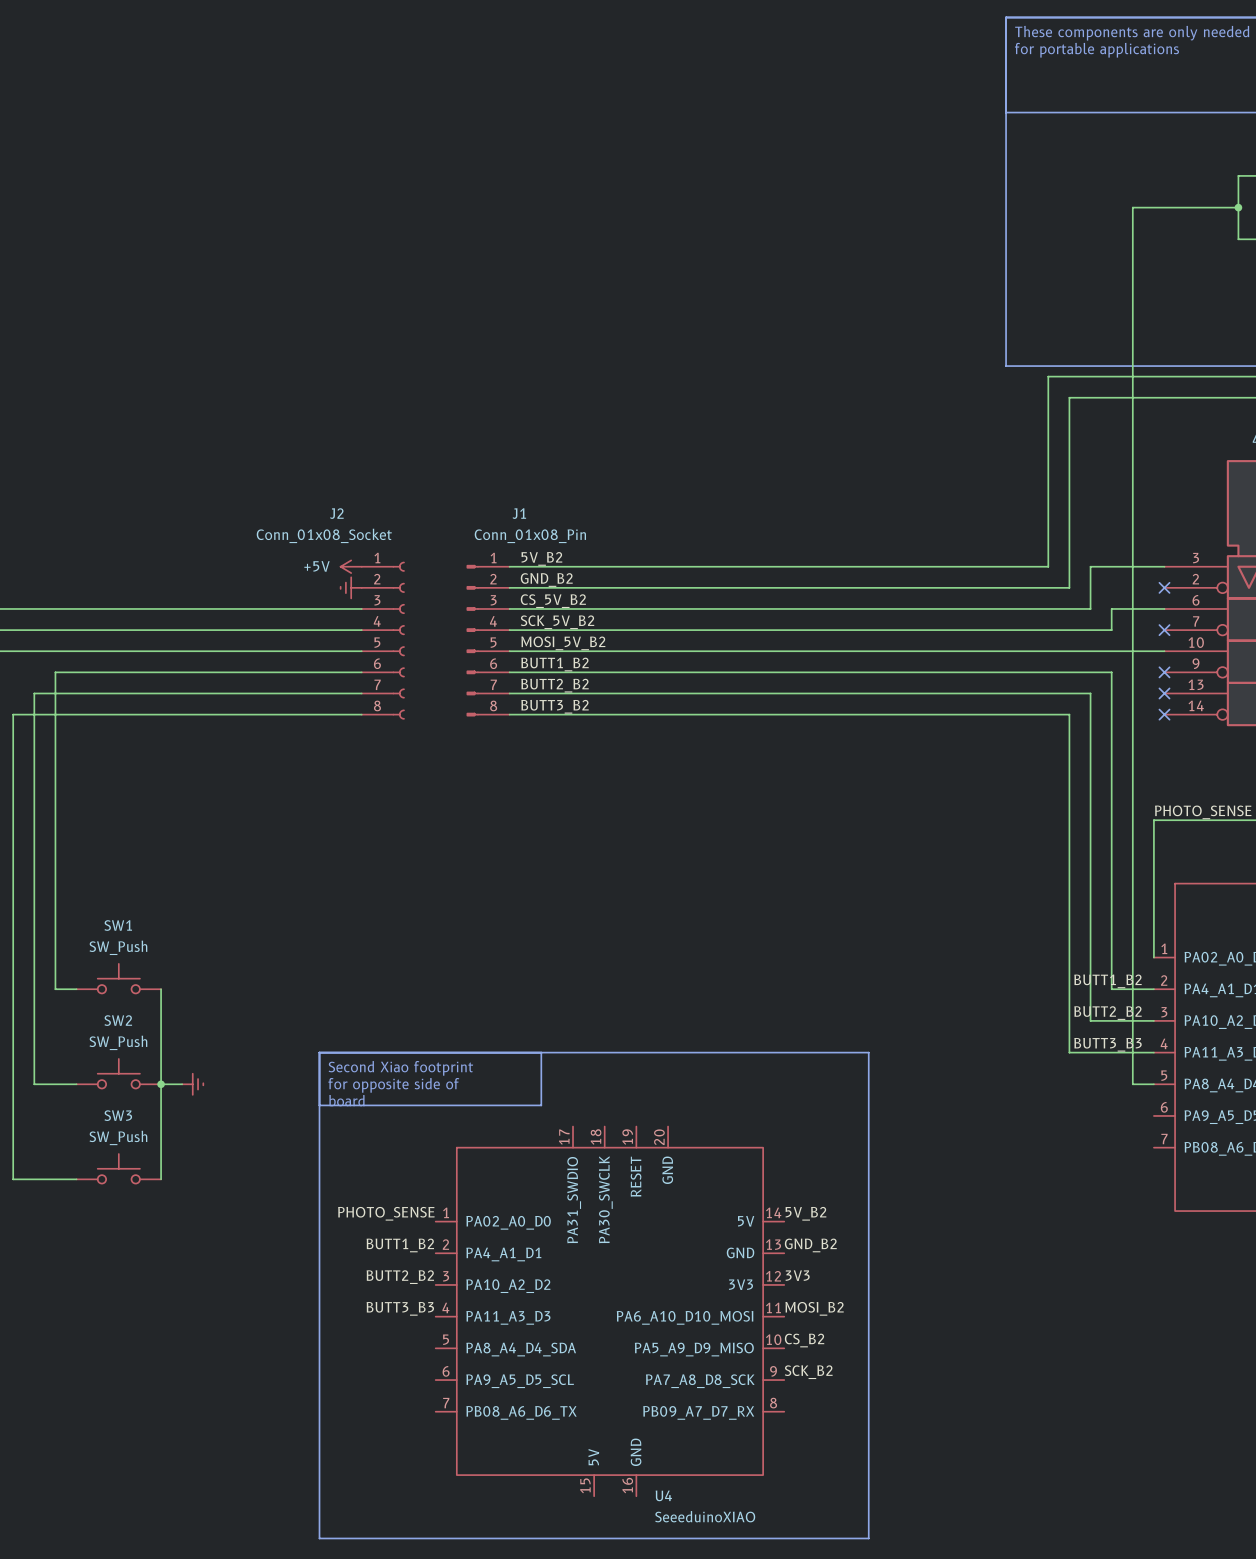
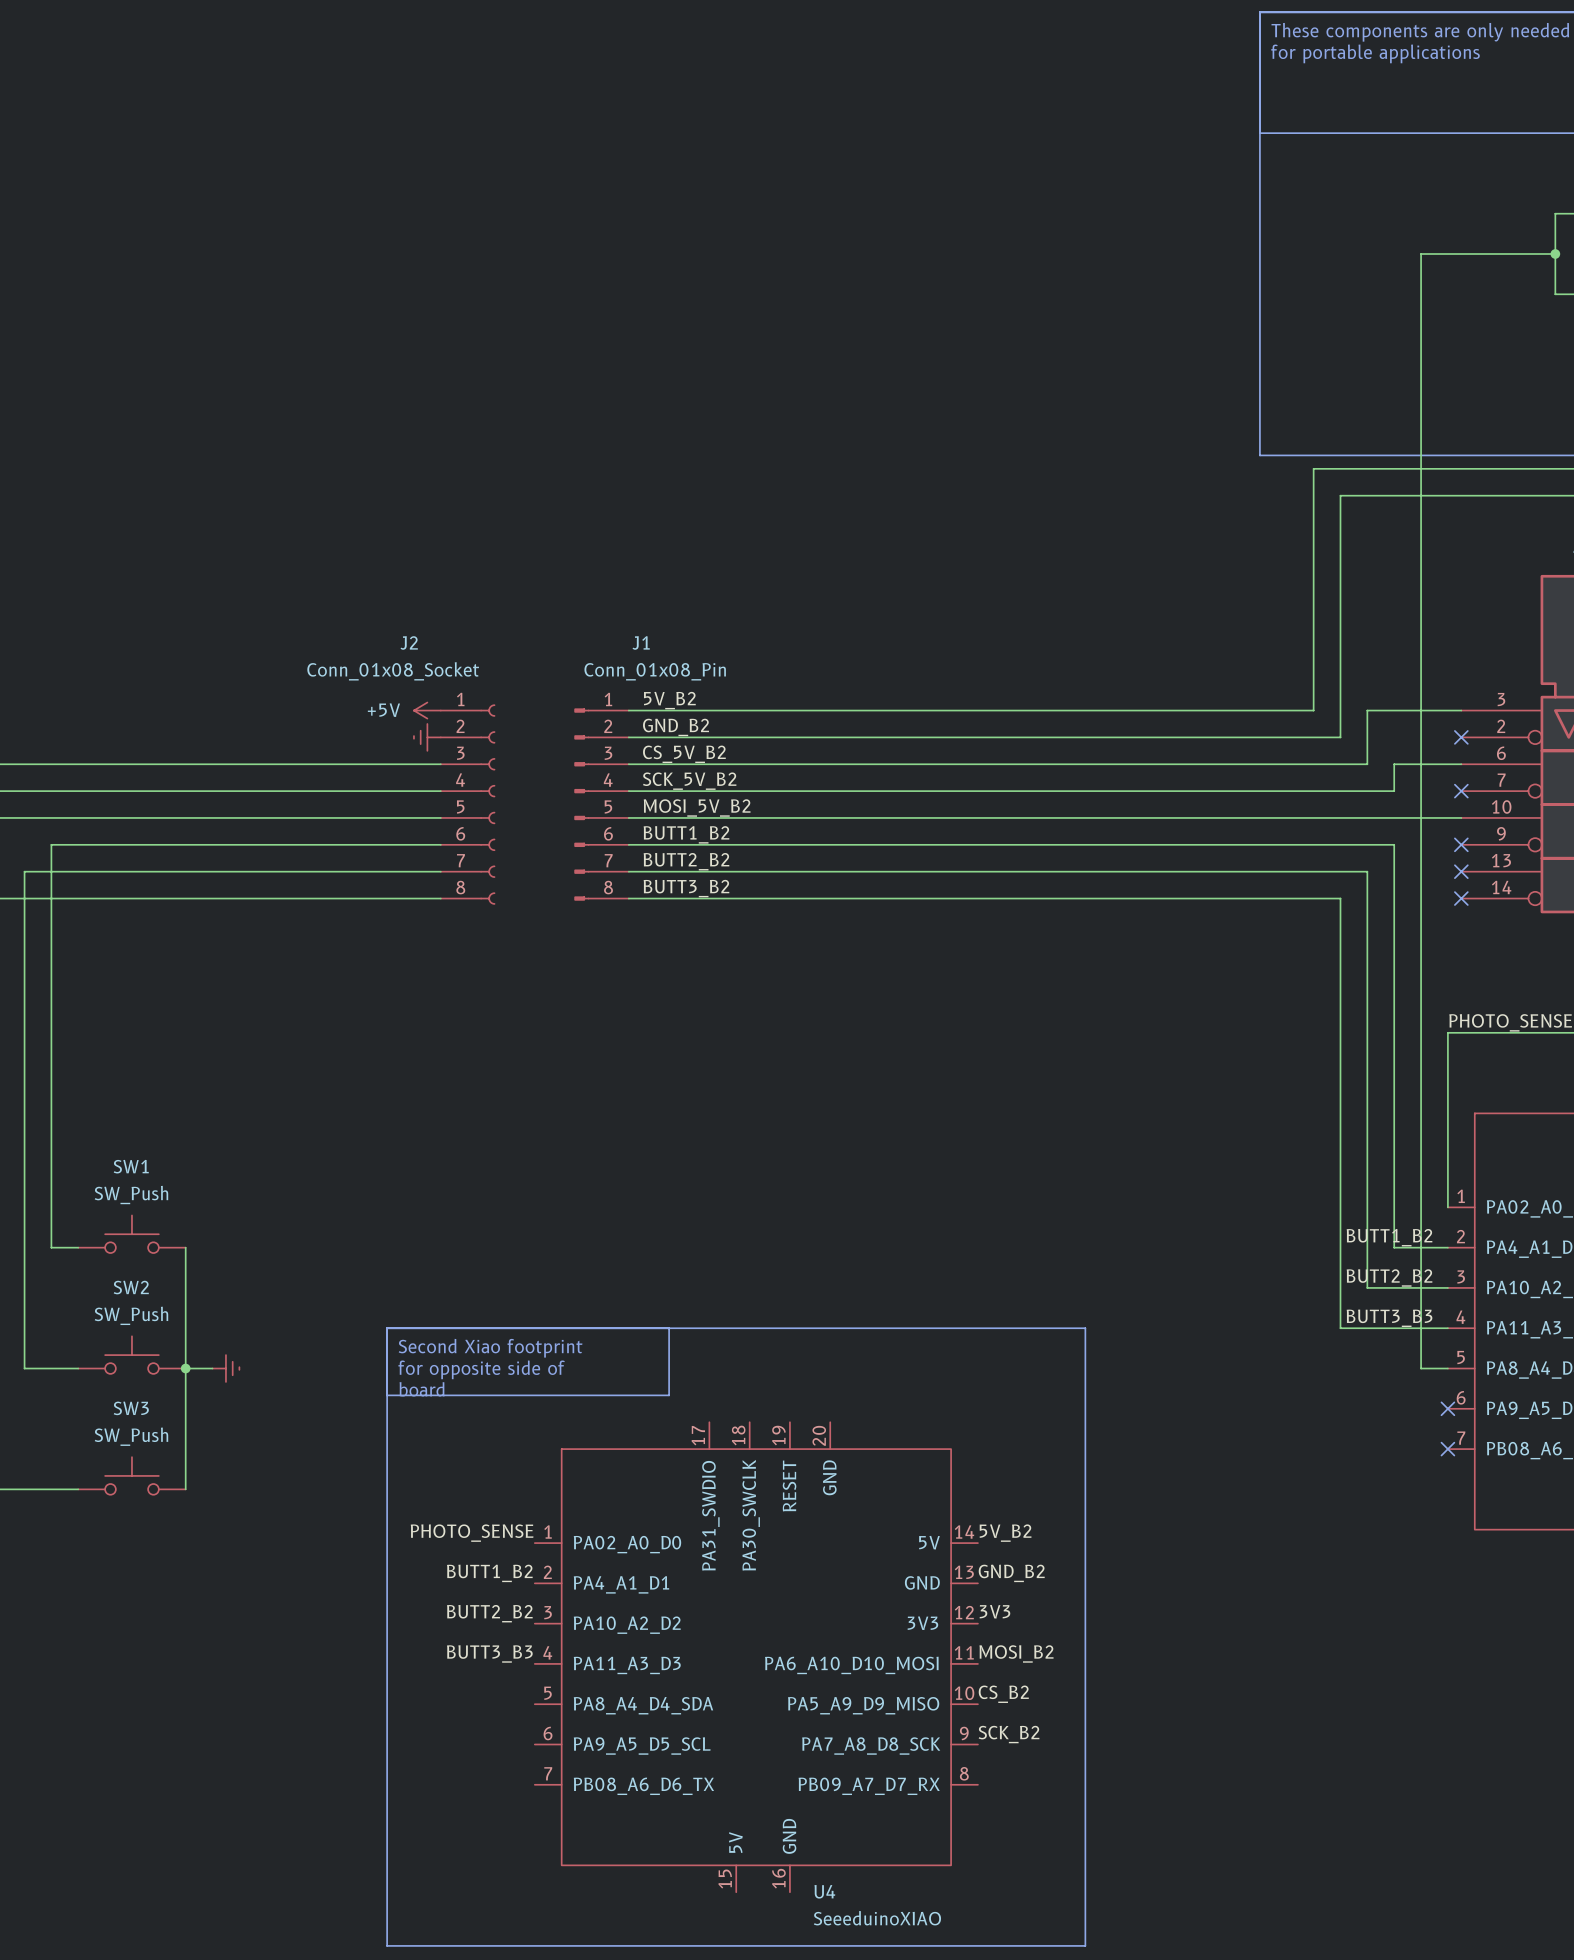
no-connect mark: none -> (1447, 1408)
no-connect mark: none -> (1447, 1449)

